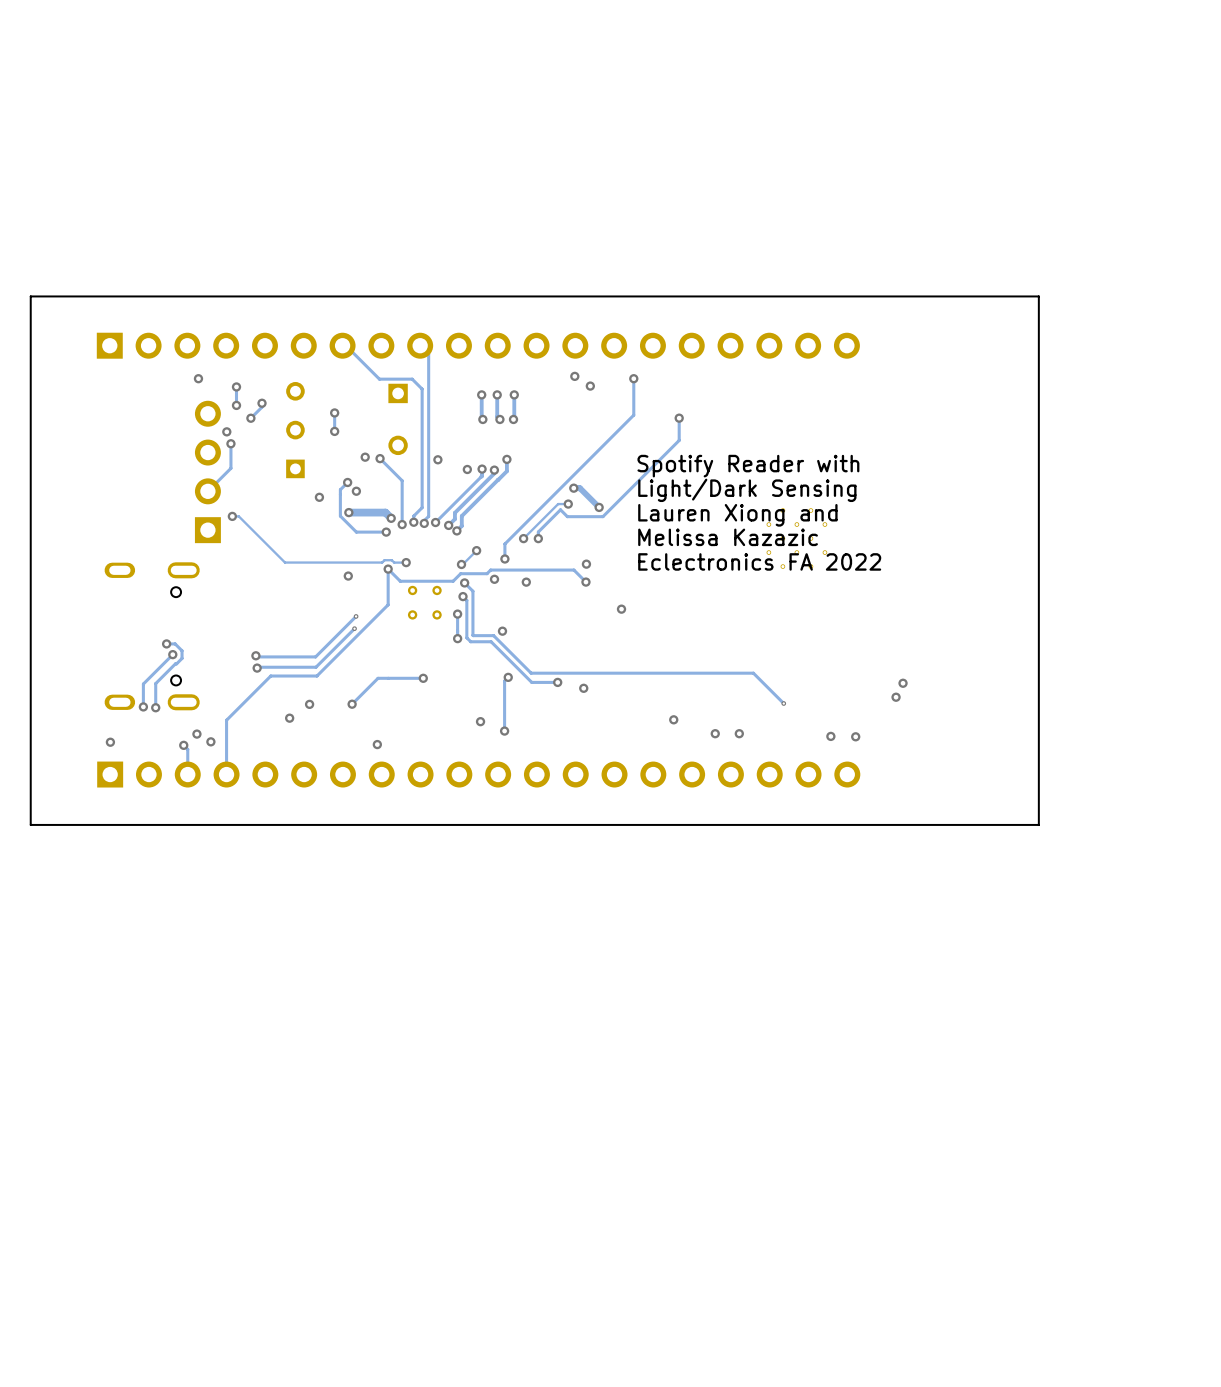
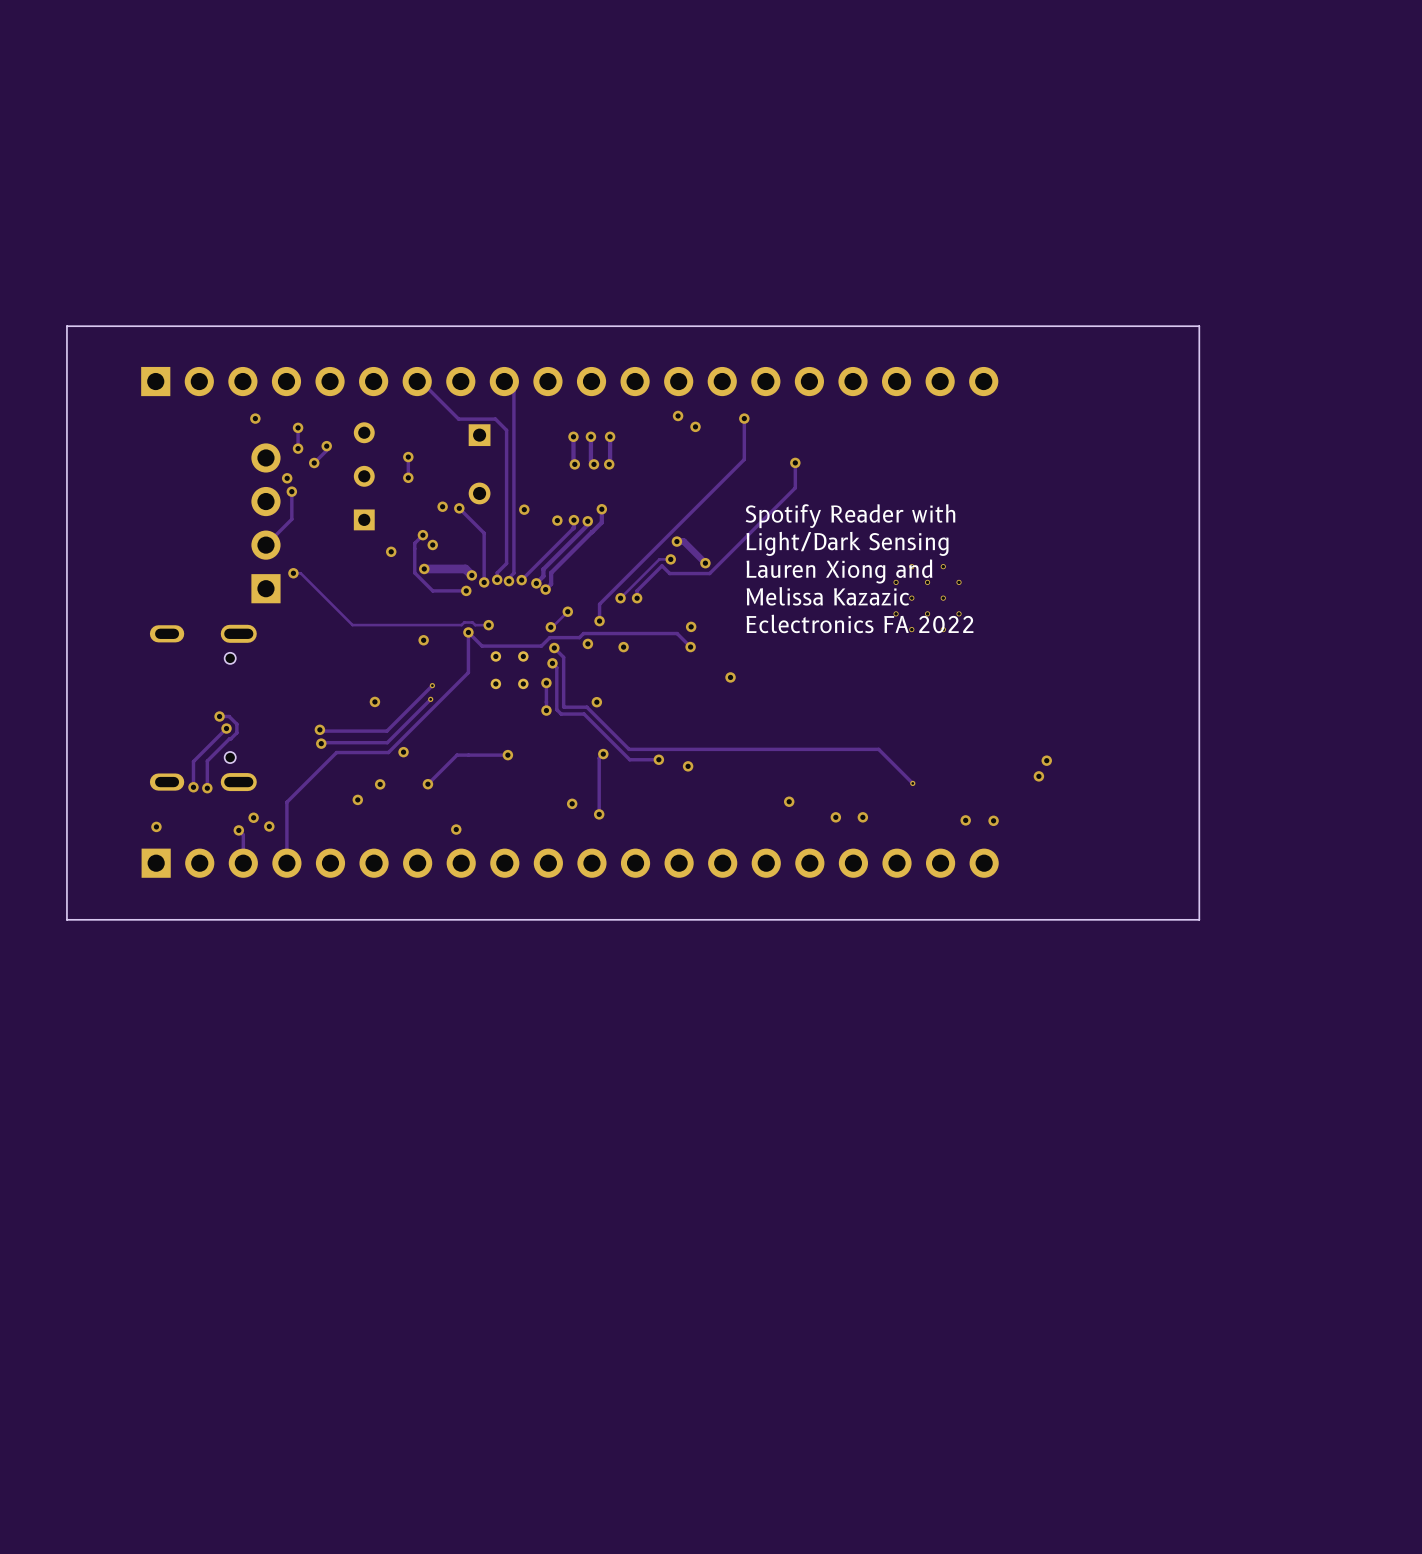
via: none -> (374, 701)
via: none -> (403, 752)

